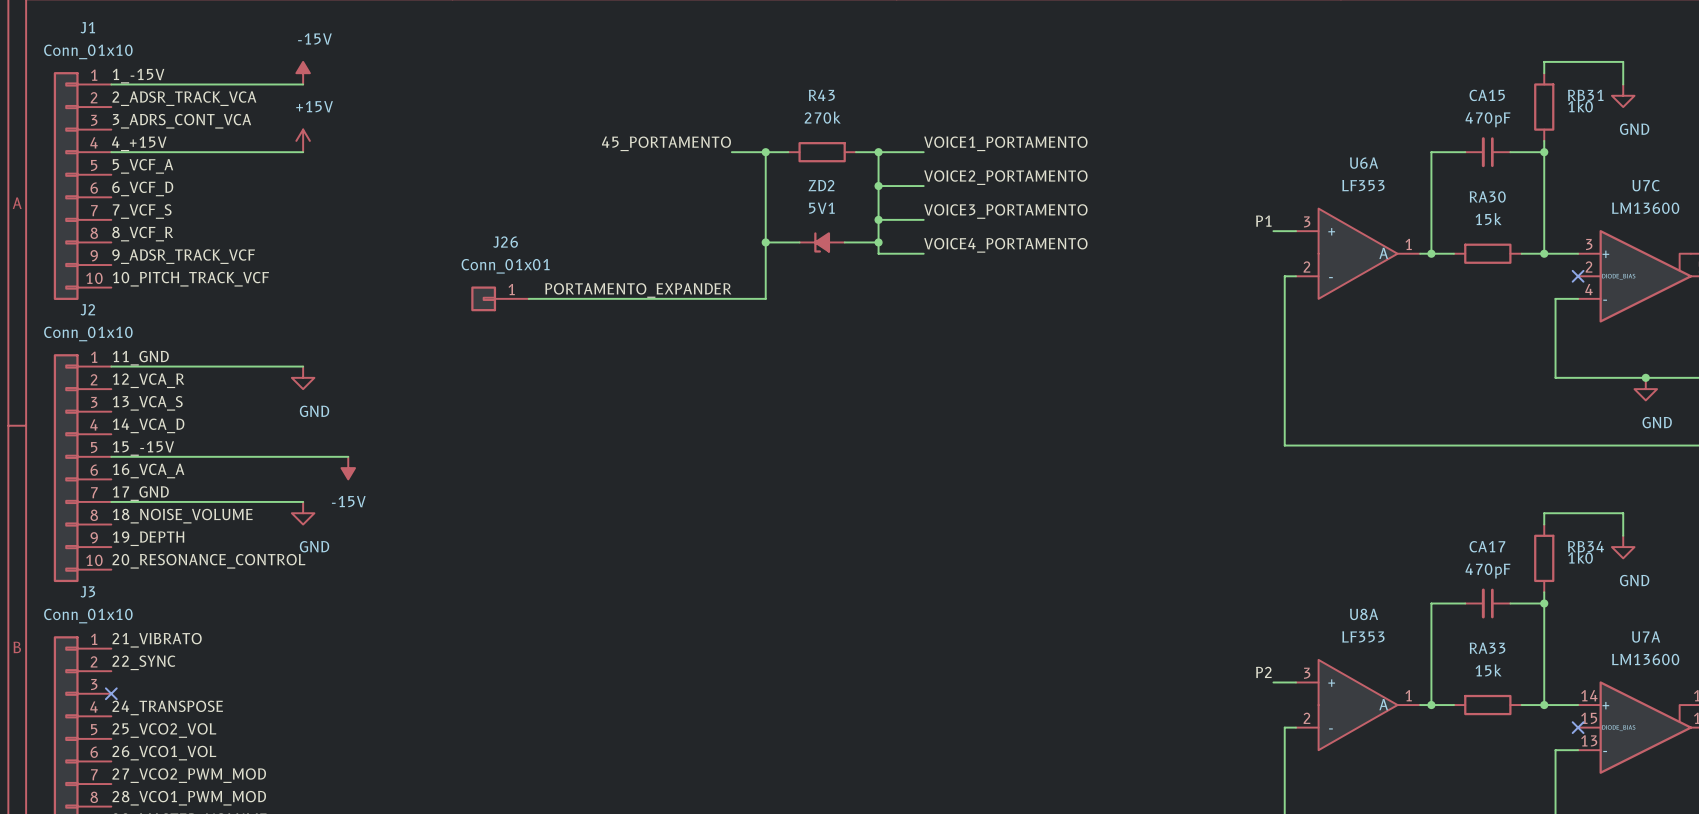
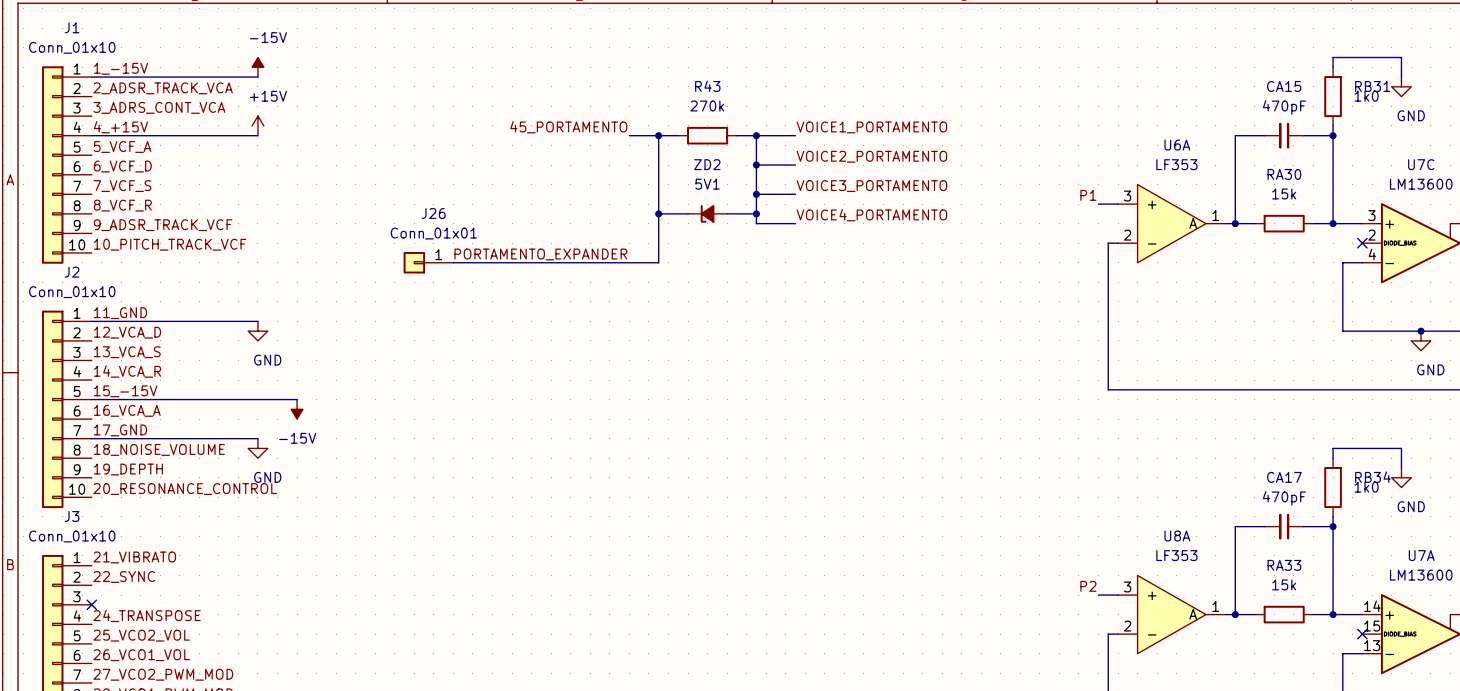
label: 12_VCA_R (148, 380) -> 12_VCA_D (127, 332)
label: 14_VCA_D (148, 425) -> 14_VCA_R (127, 371)

